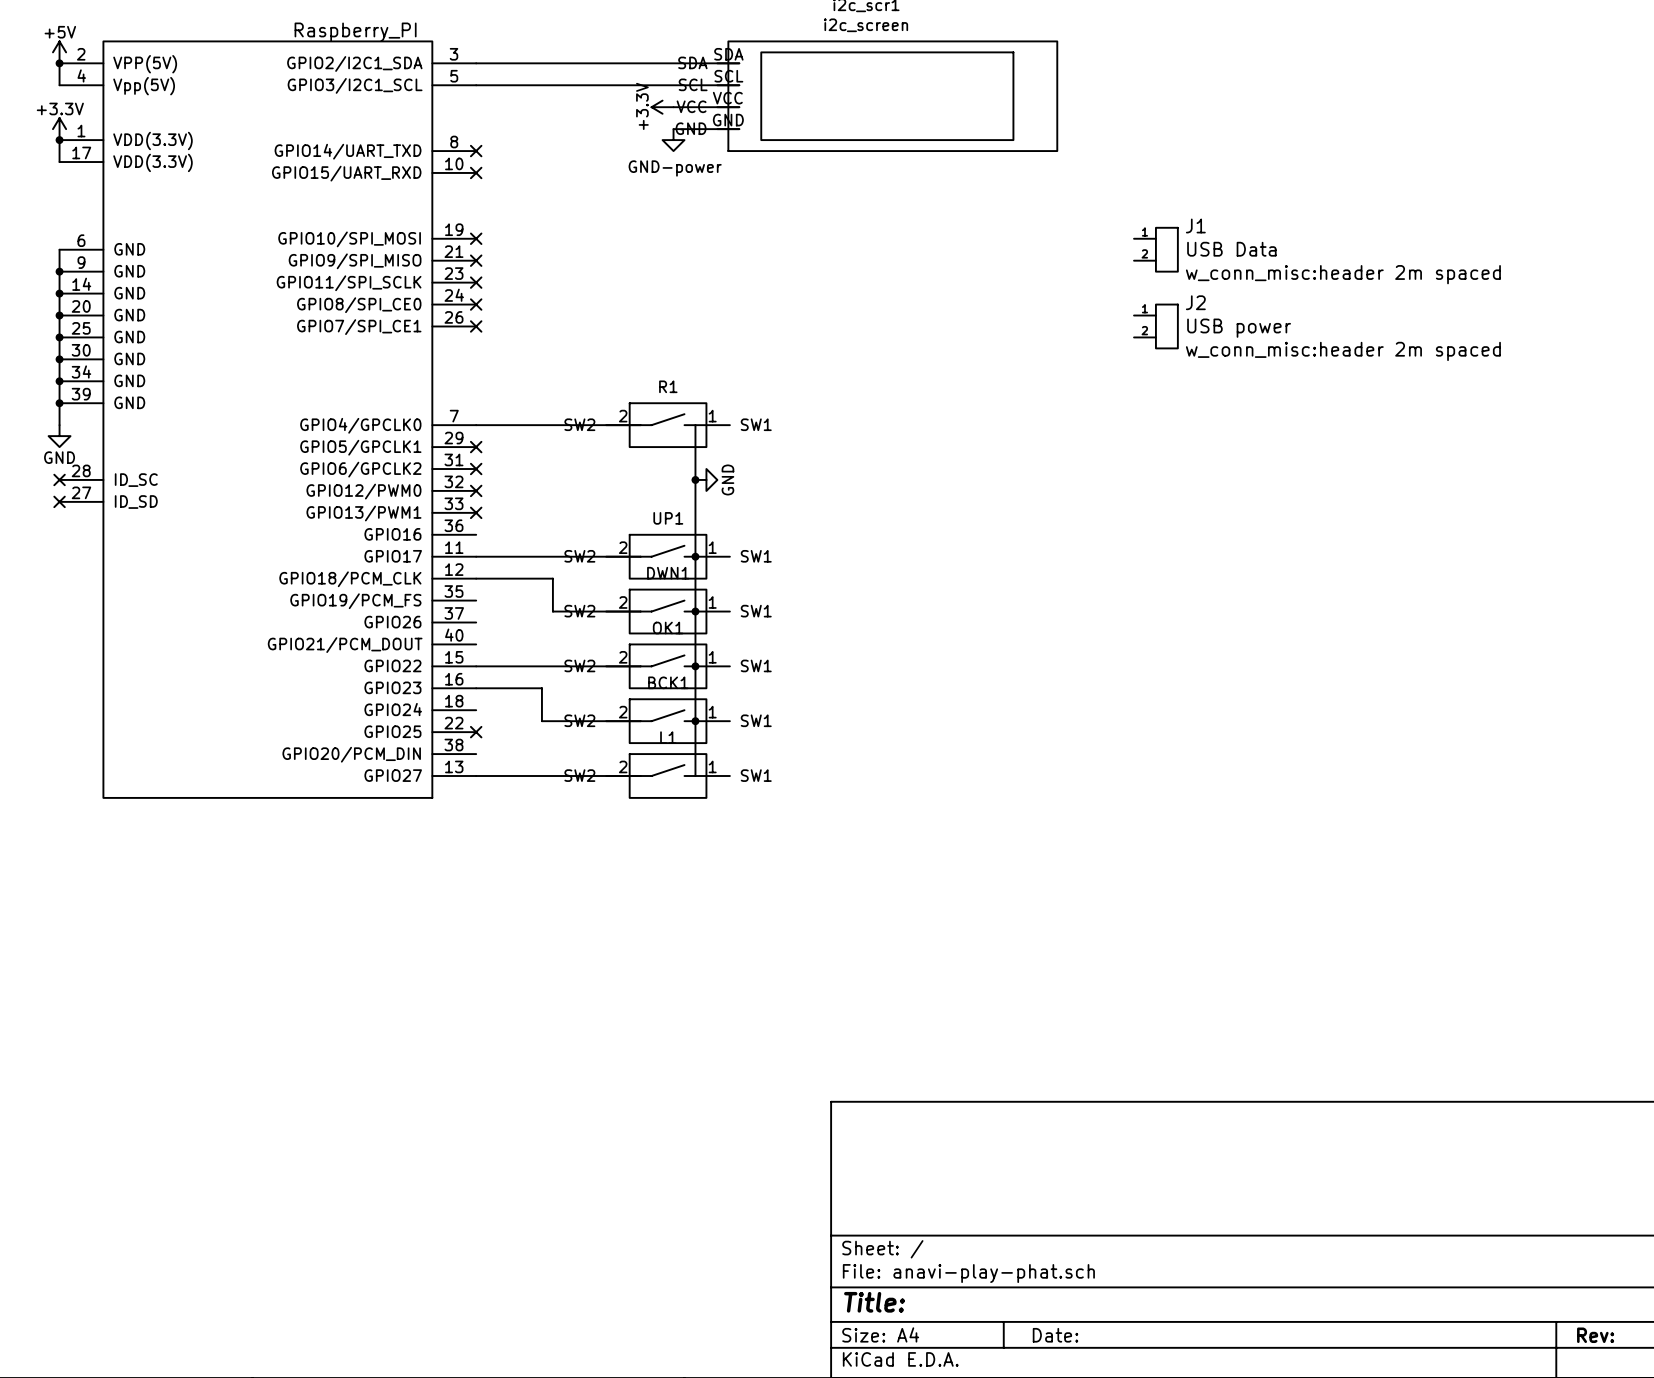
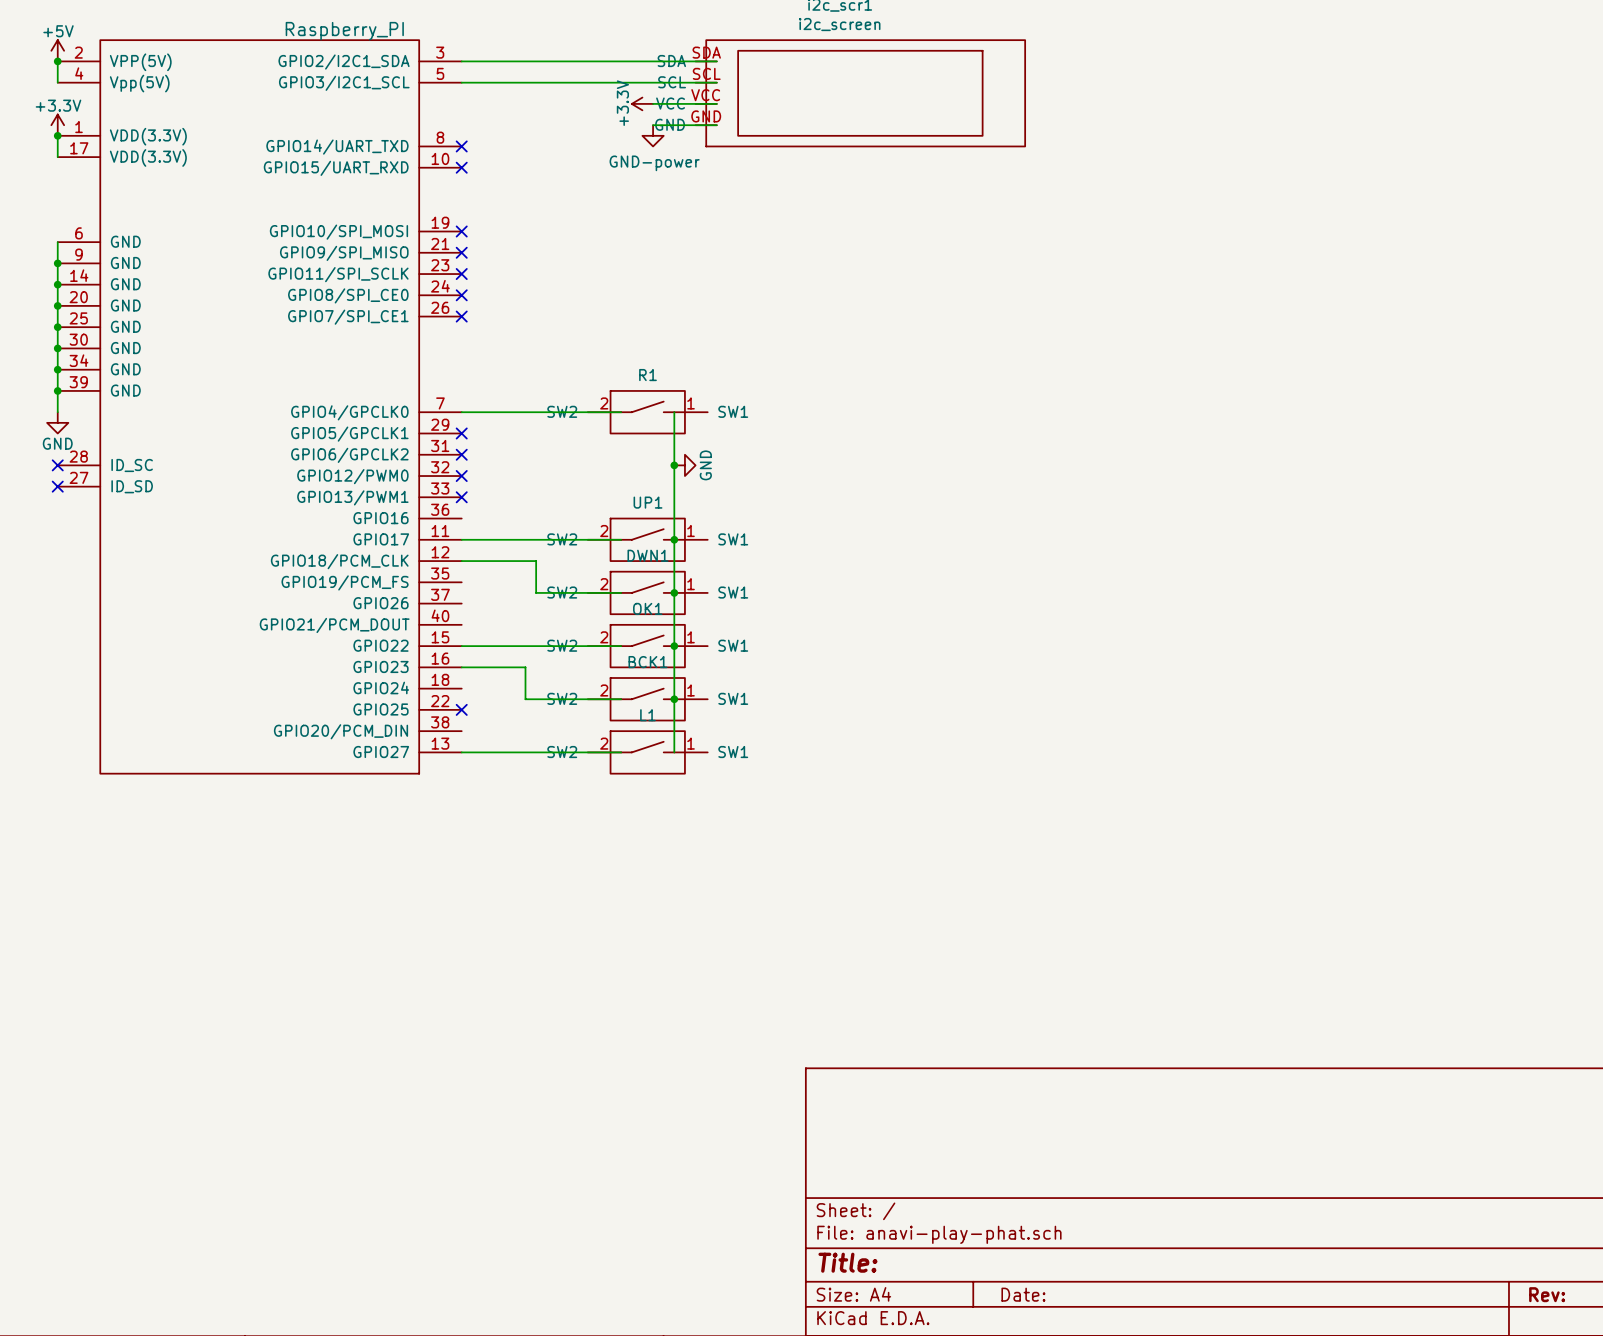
J1: USB Data (1155, 249) -> none
J2: USB power (1155, 326) -> none

